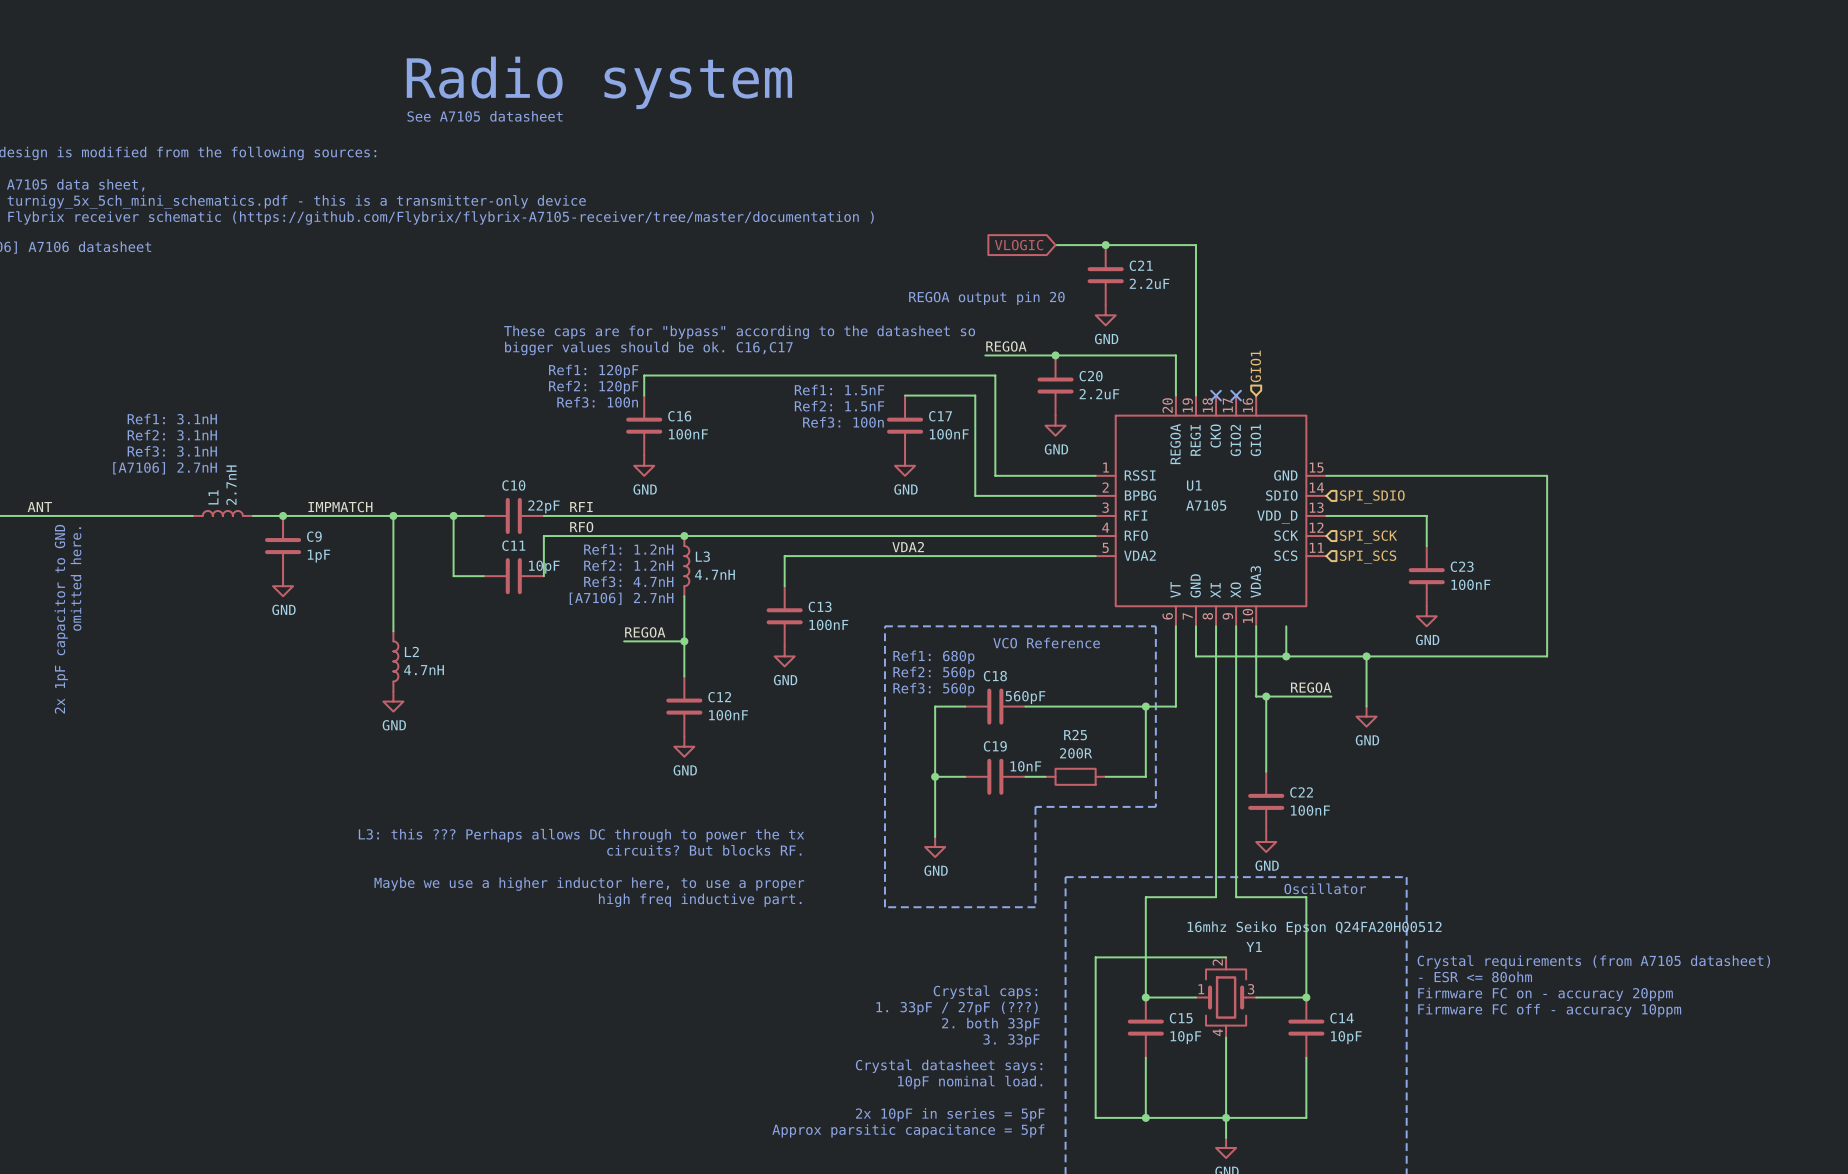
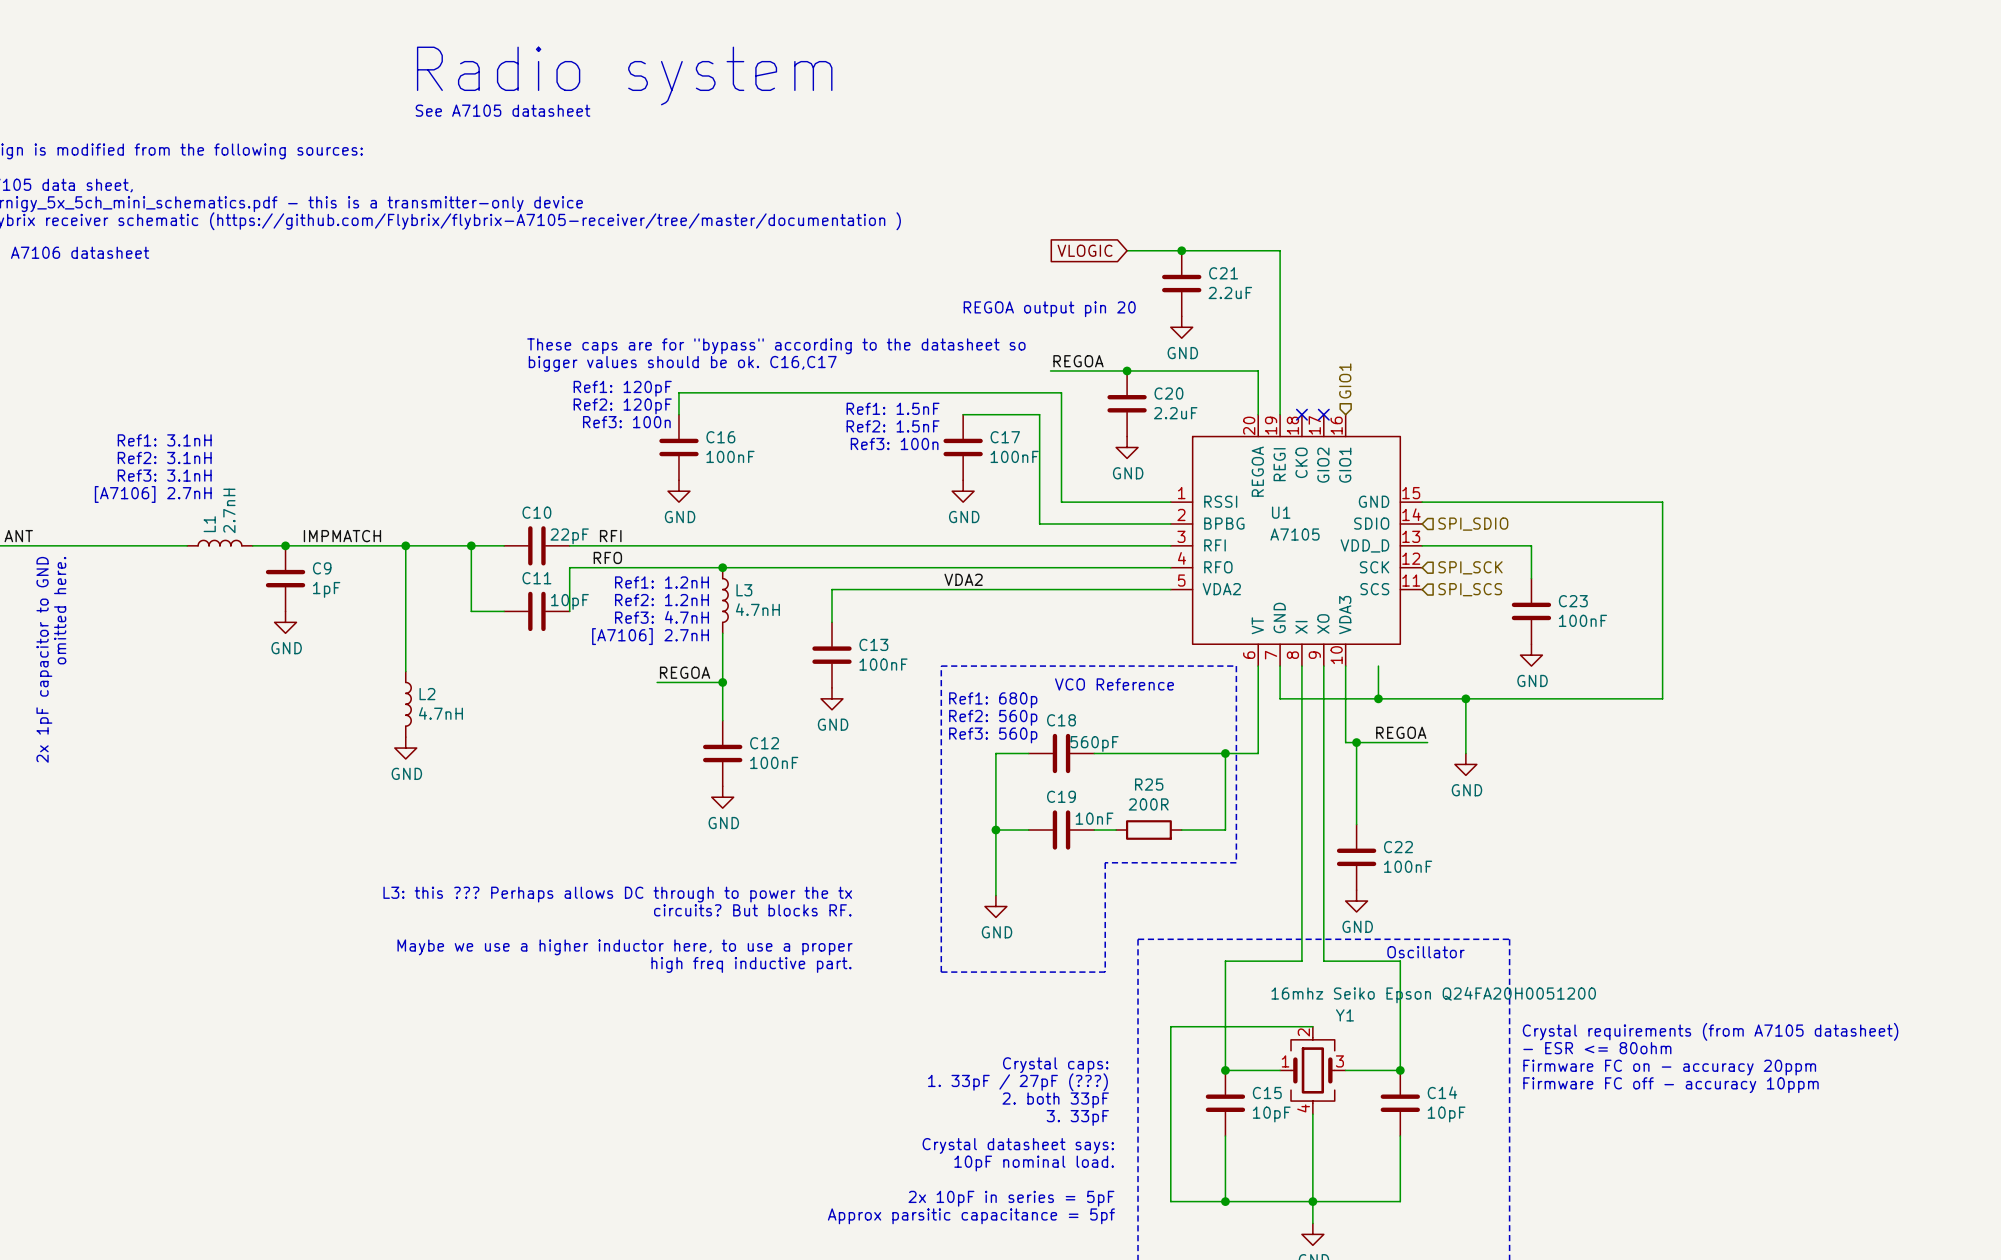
Y1 value: 16mhz Seiko Epson Q24FA20H00512 (1314, 928) -> 16mhz Seiko Epson Q24FA20H0051200 (1433, 995)

